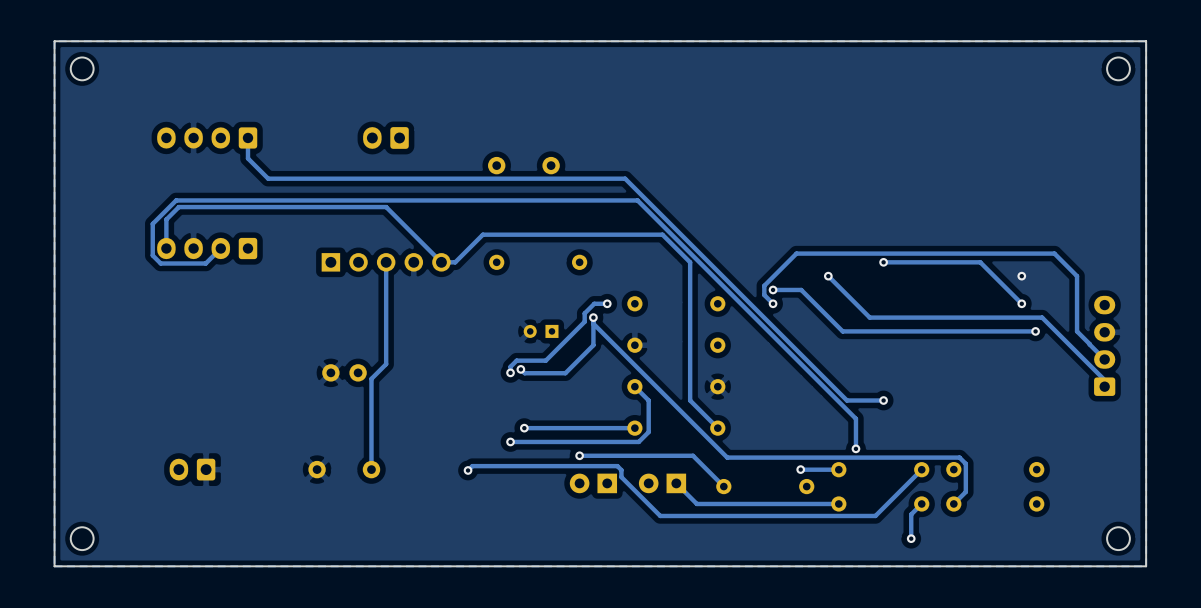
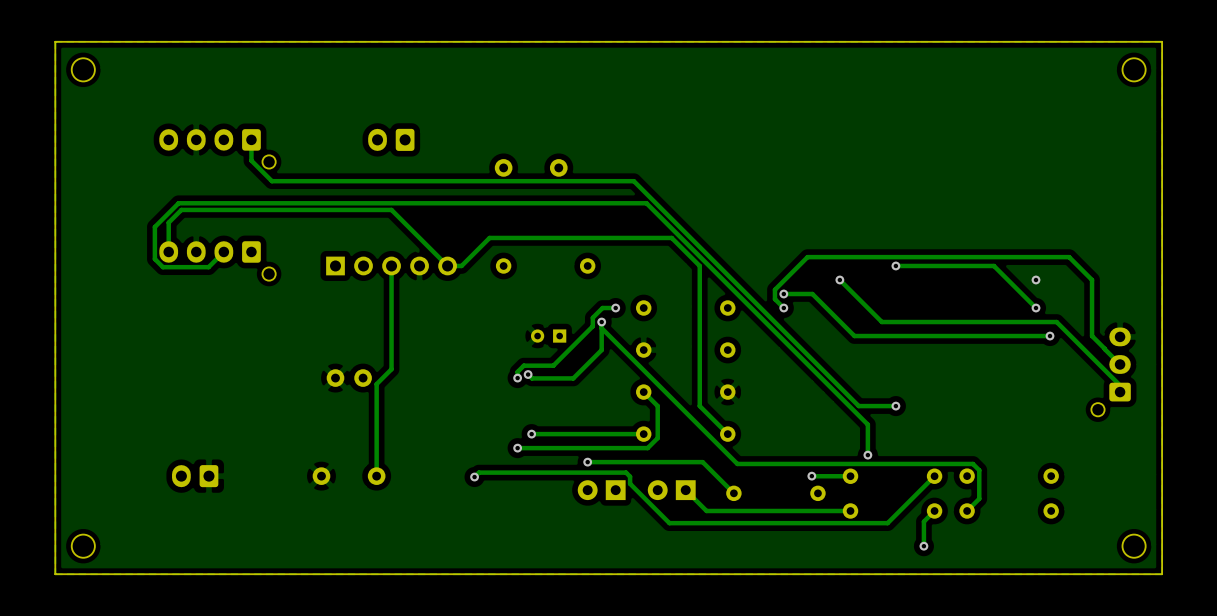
part: none -> (217, 148)
part: none -> (217, 260)
part: (1104, 345) -> none
part: none -> (1111, 371)

